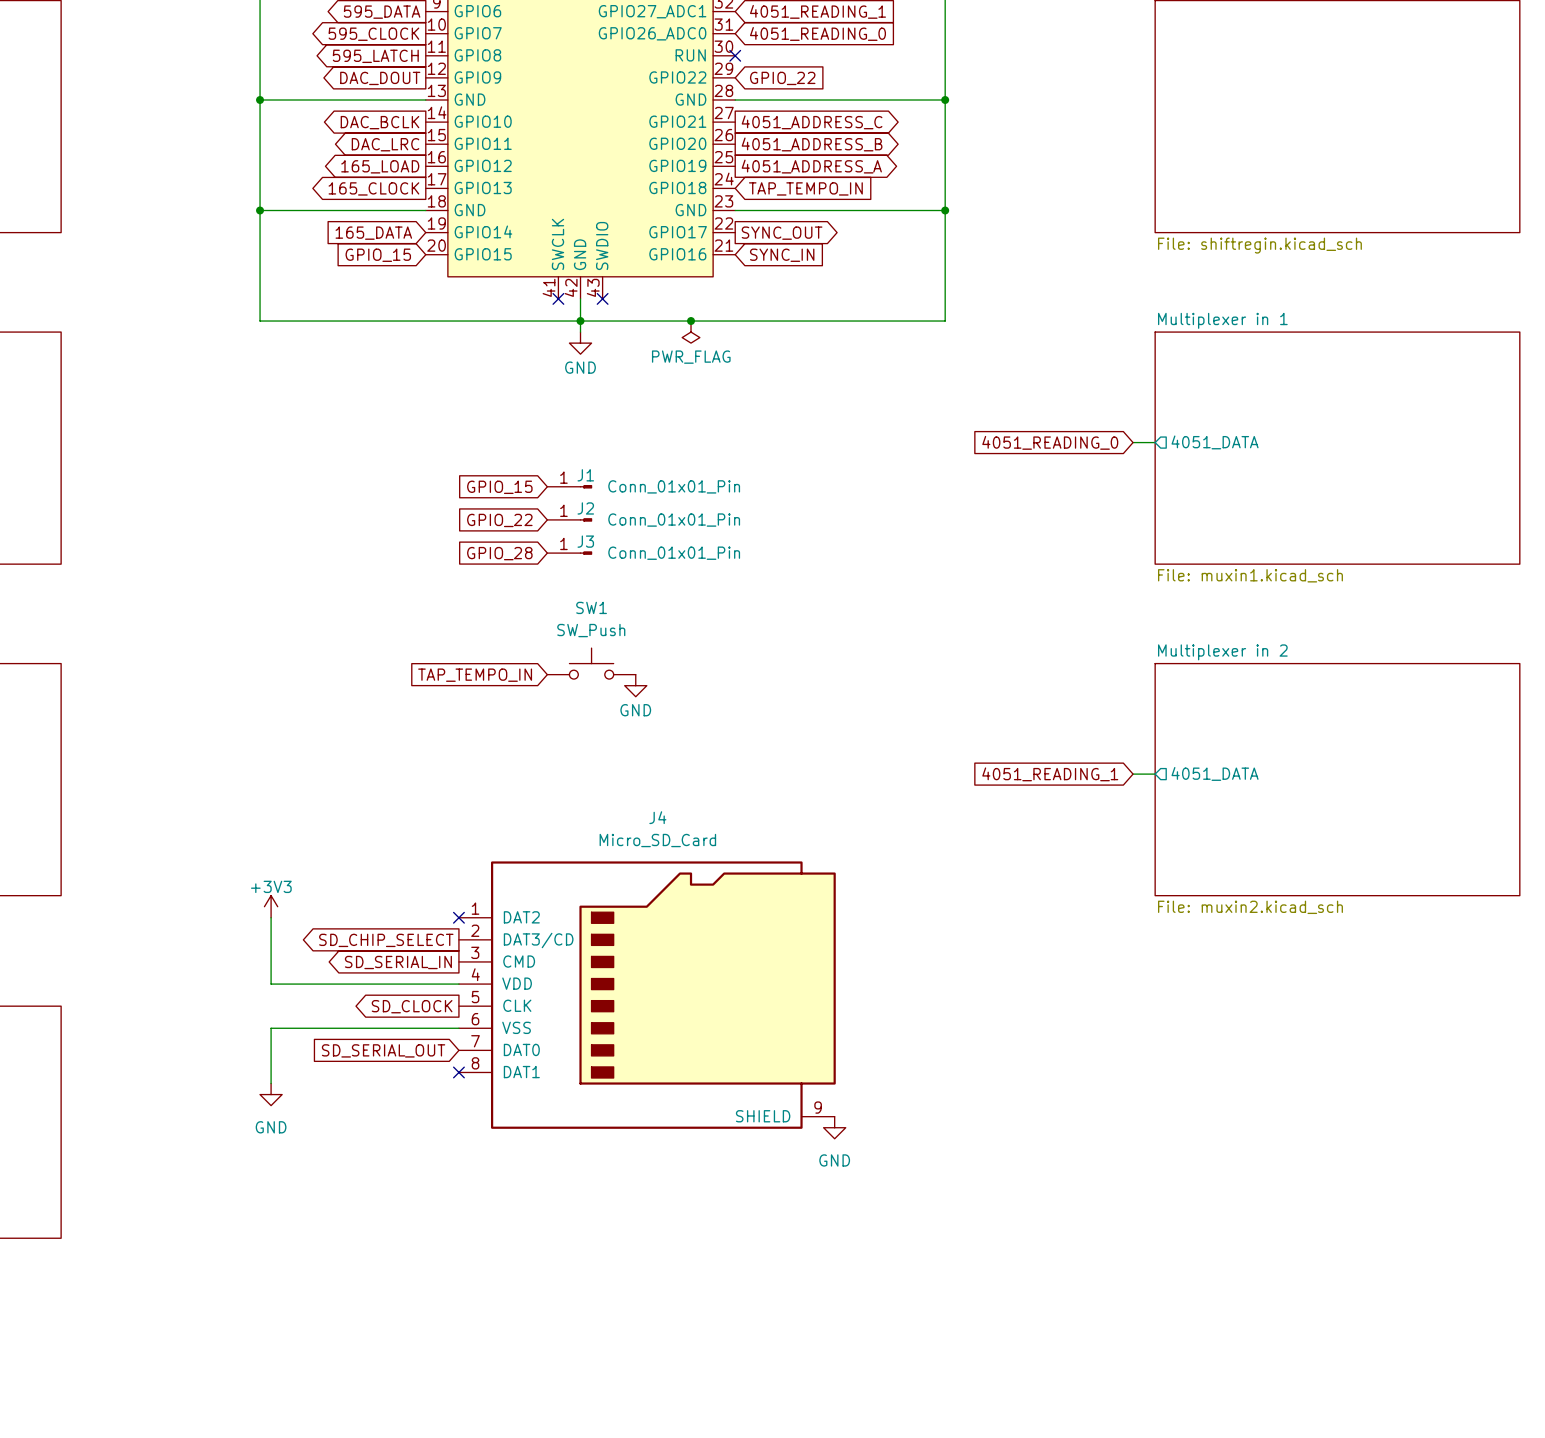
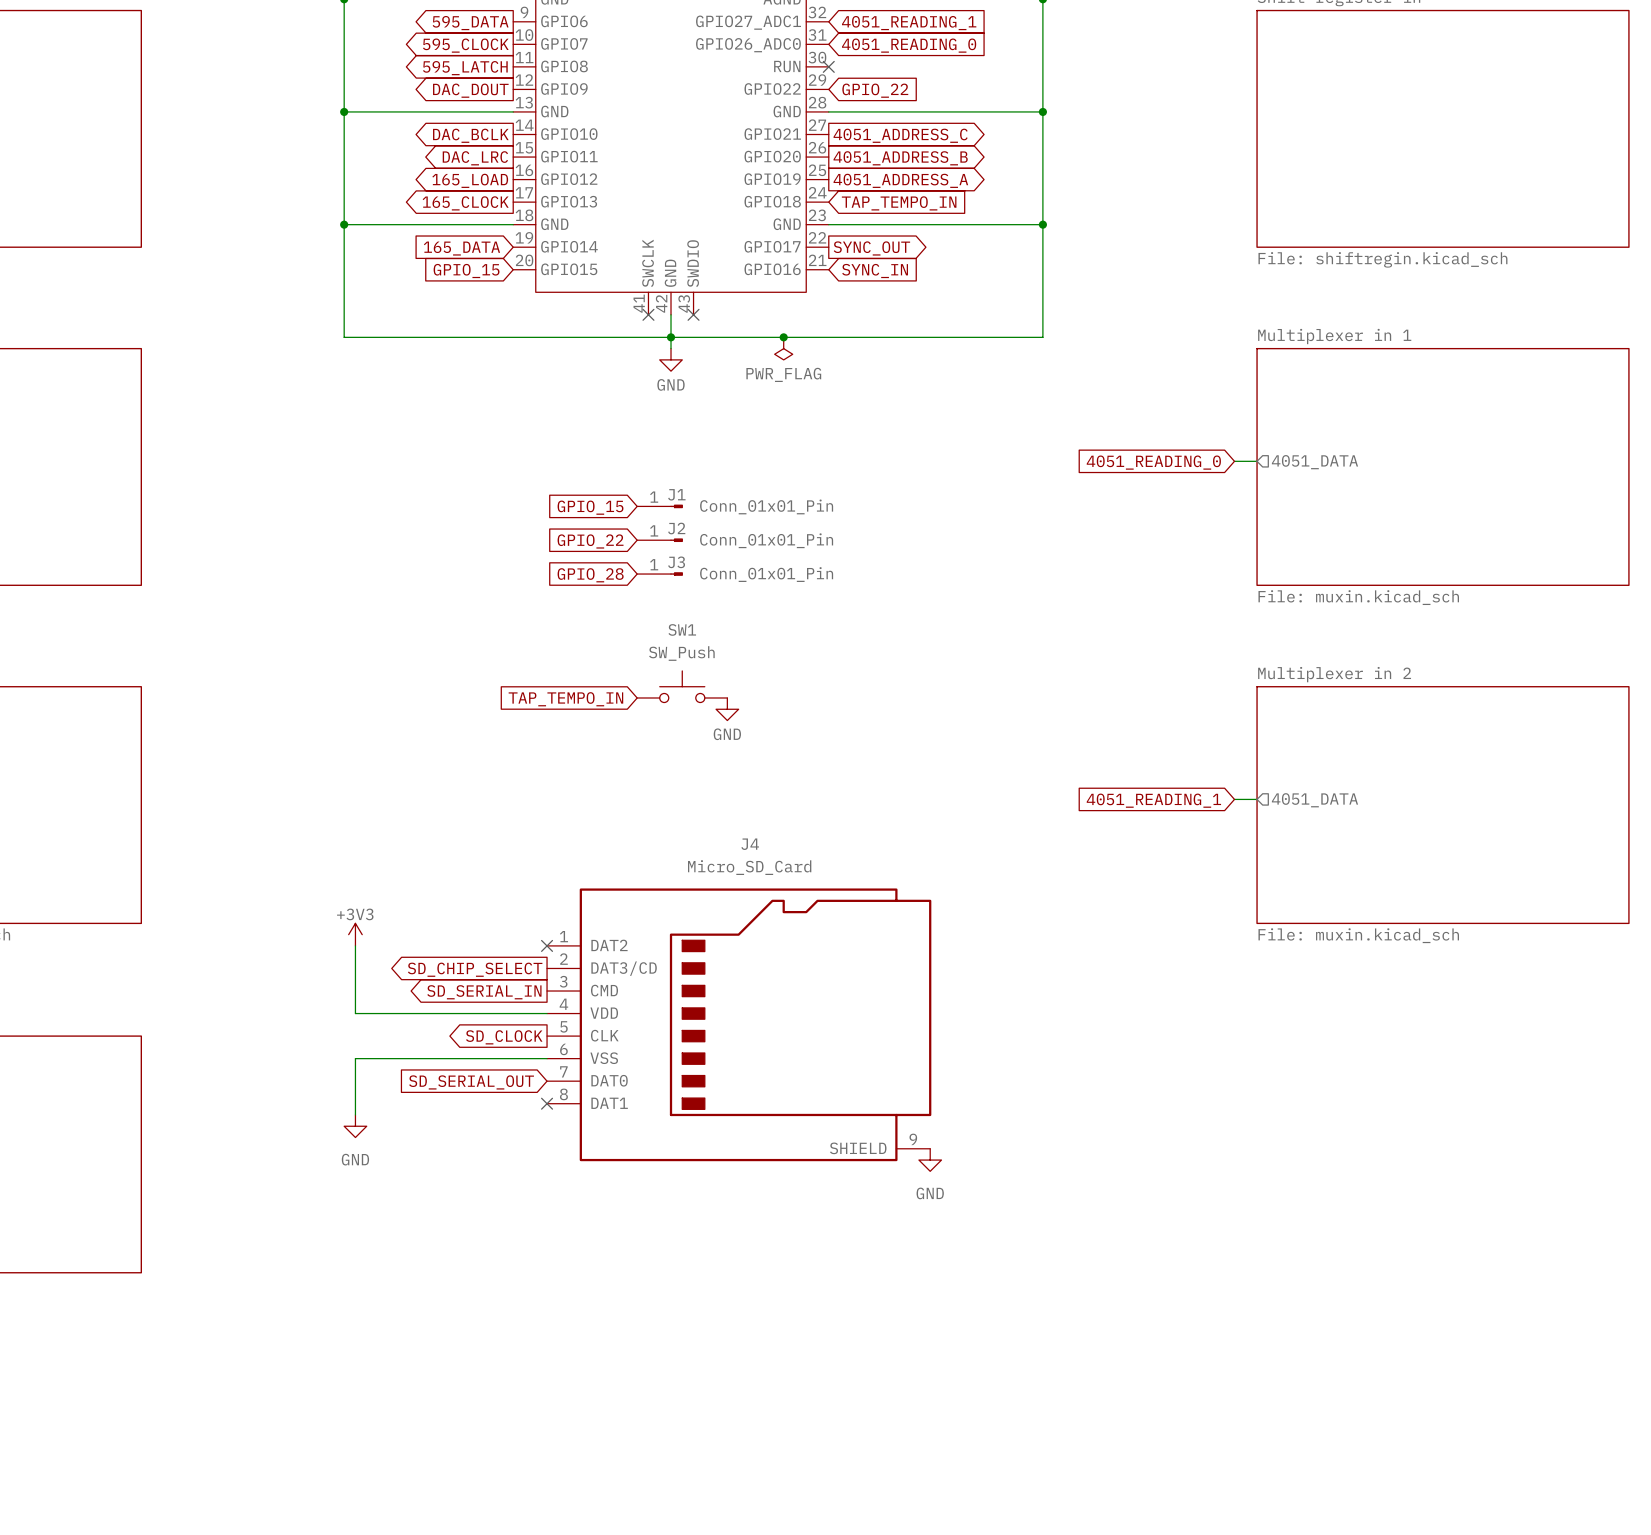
sheet Multiplexer in 1 value: File: muxin1.kicad_sch (1250, 575) -> File: muxin.kicad_sch (1358, 597)
sheet Multiplexer in 2 value: File: muxin2.kicad_sch (1250, 907) -> File: muxin.kicad_sch (1358, 935)

